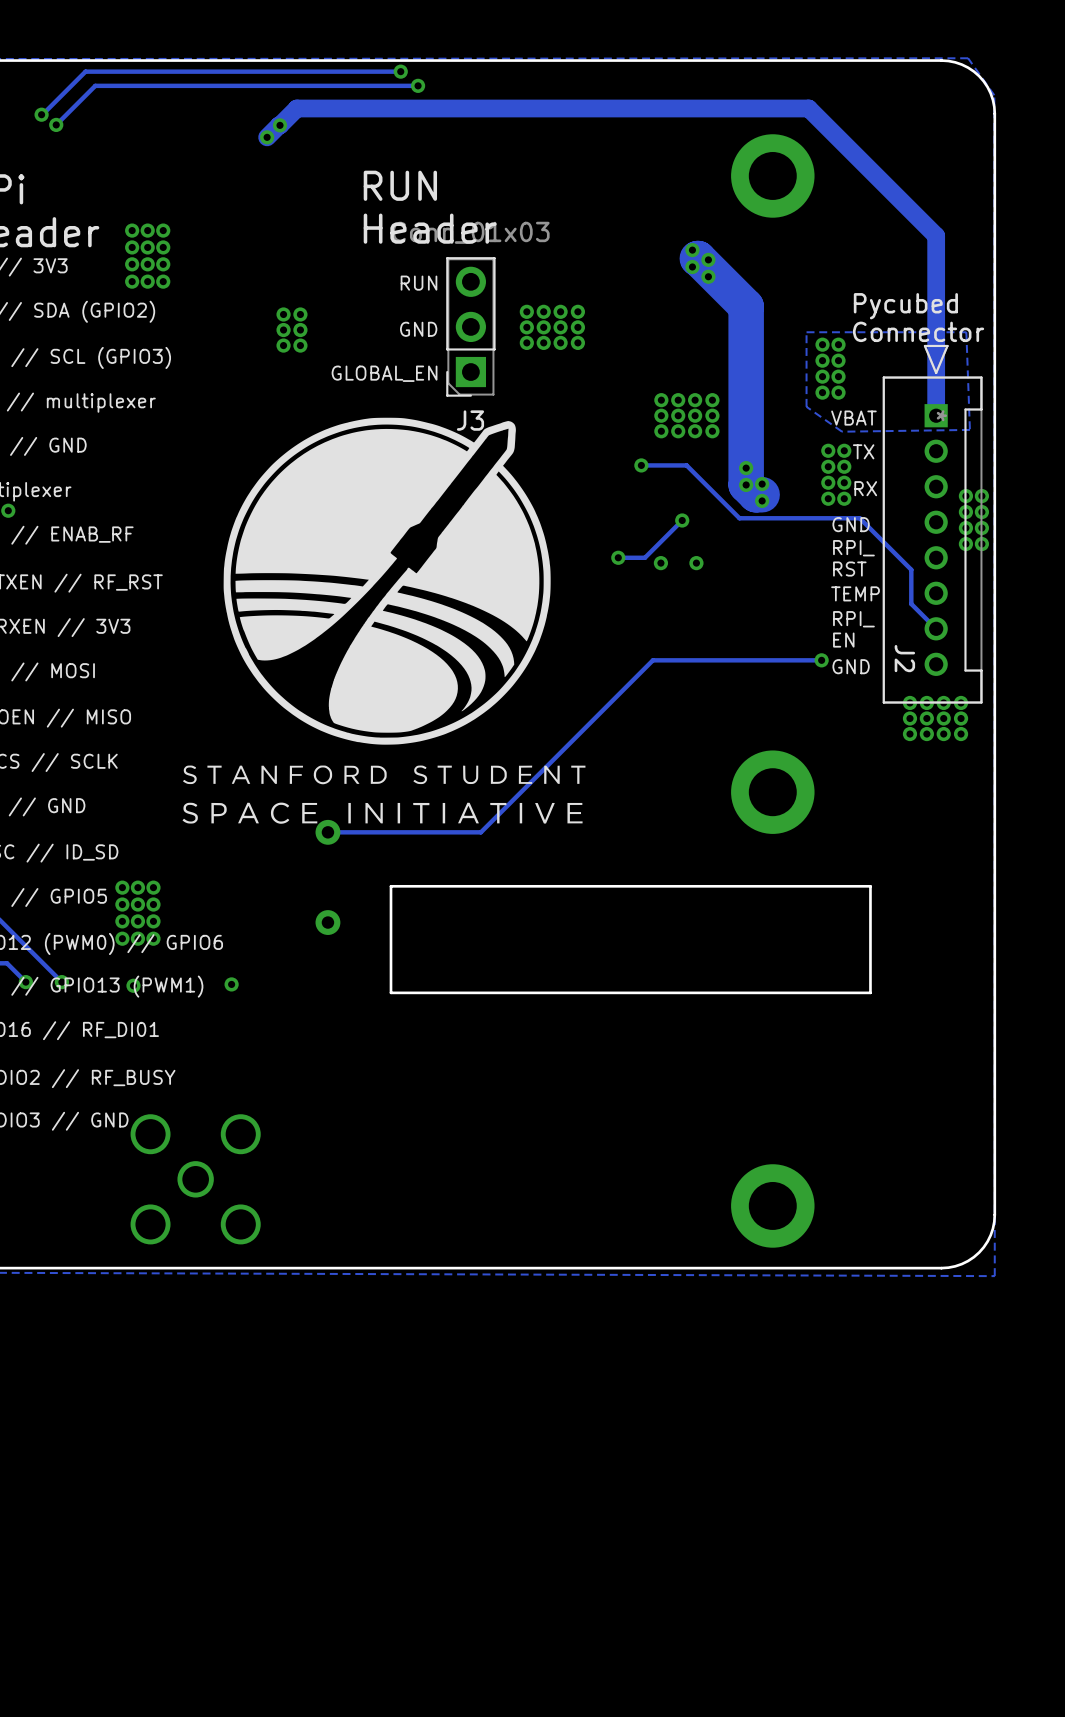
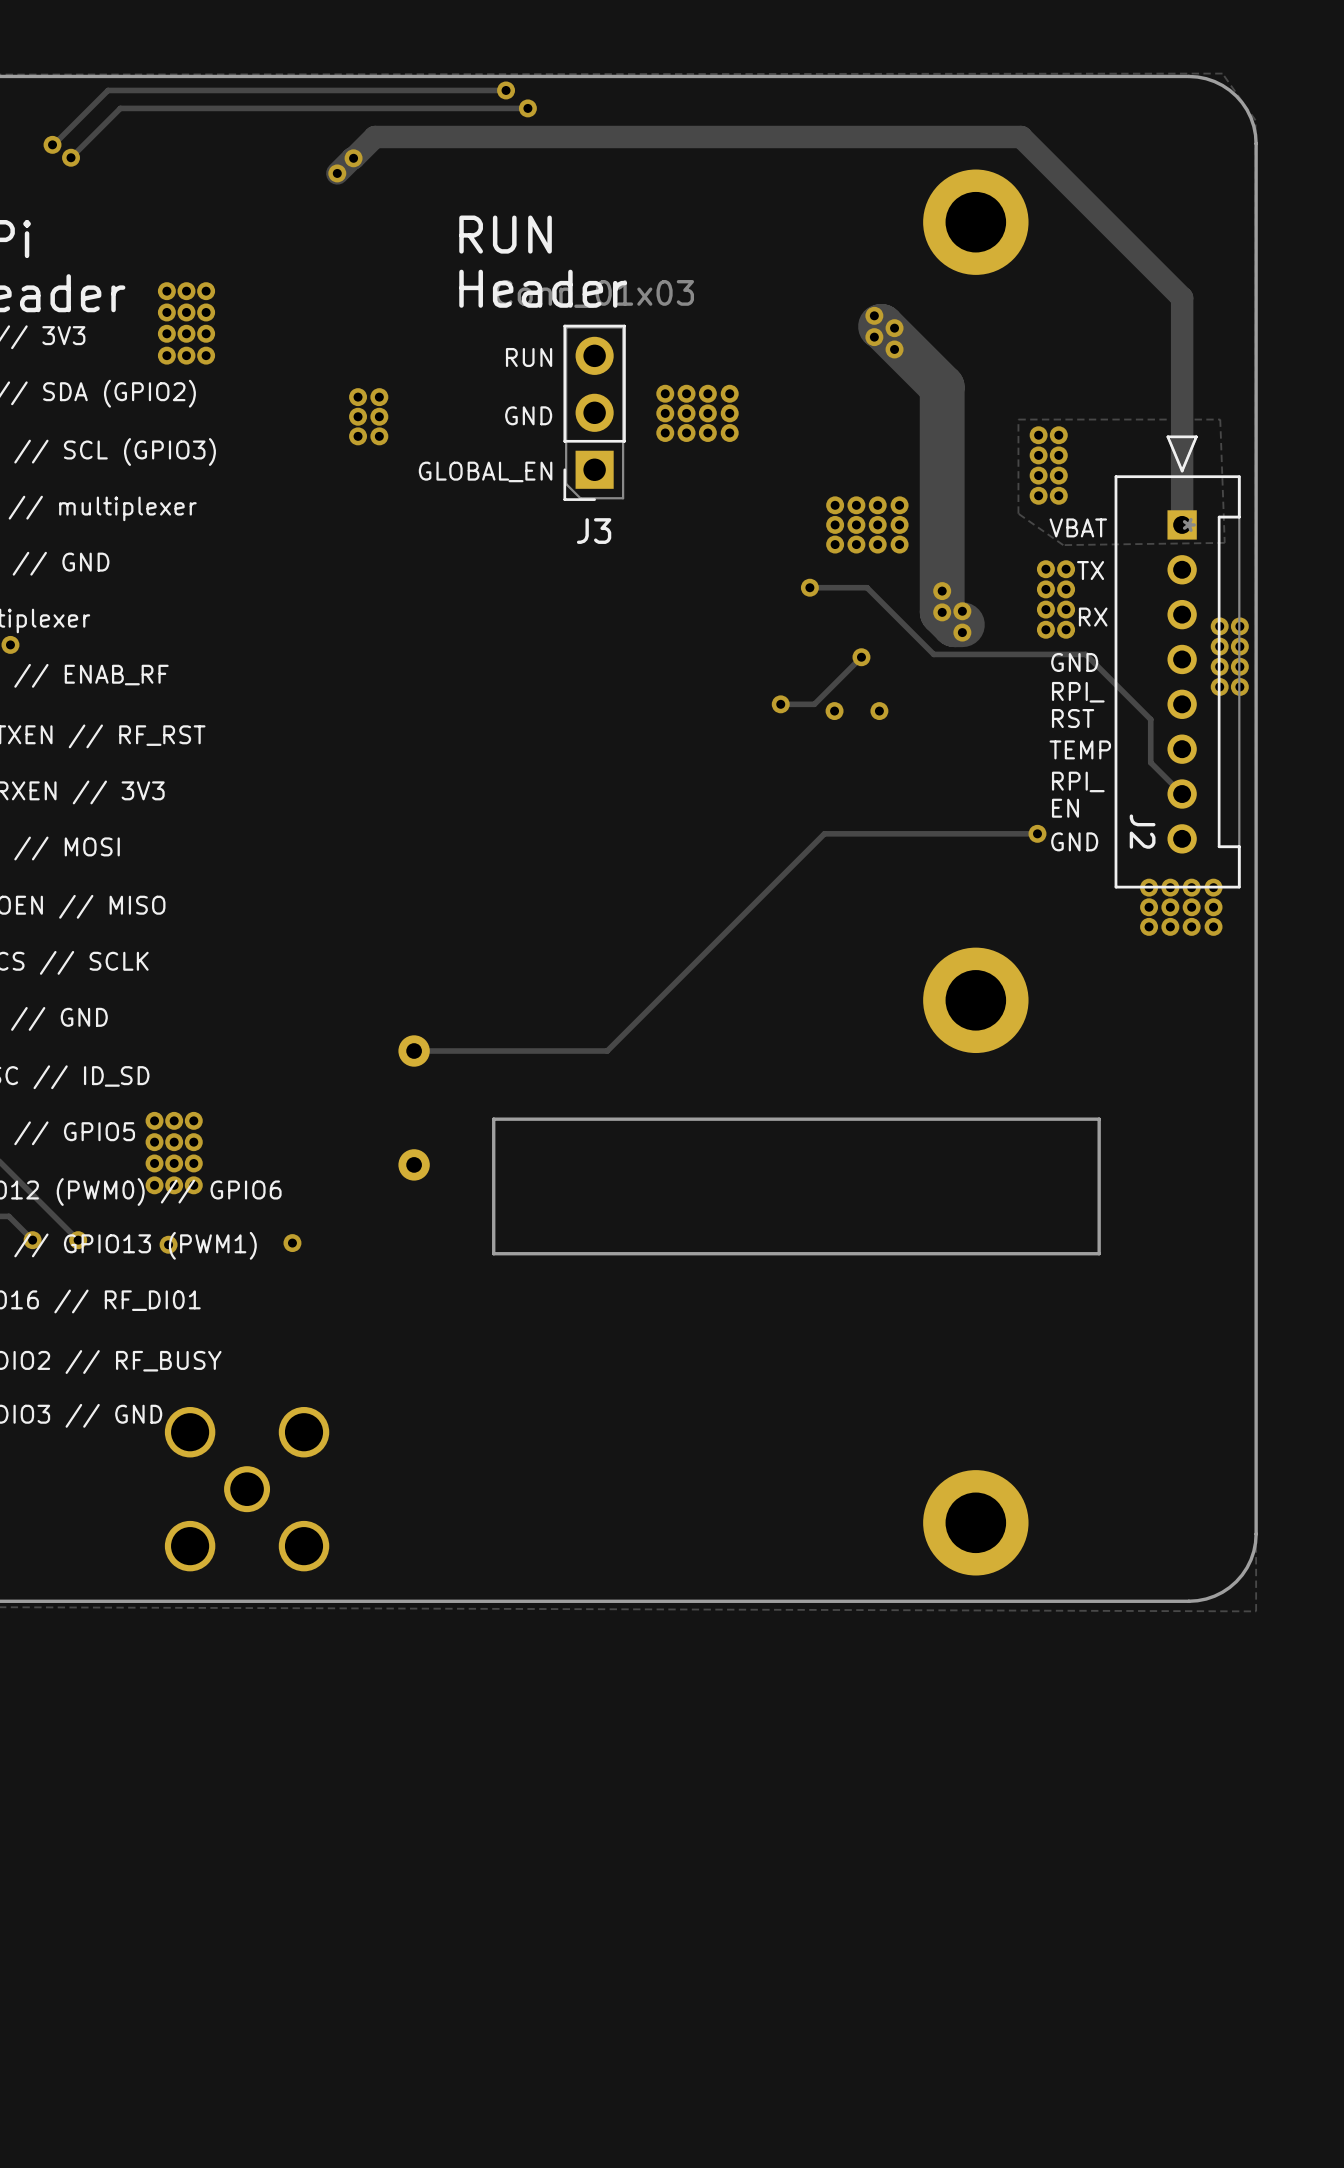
text: Pycubed (905, 306) -> none
text: Connector (918, 331) -> none
drawing: [182, 417, 586, 824] -> none

